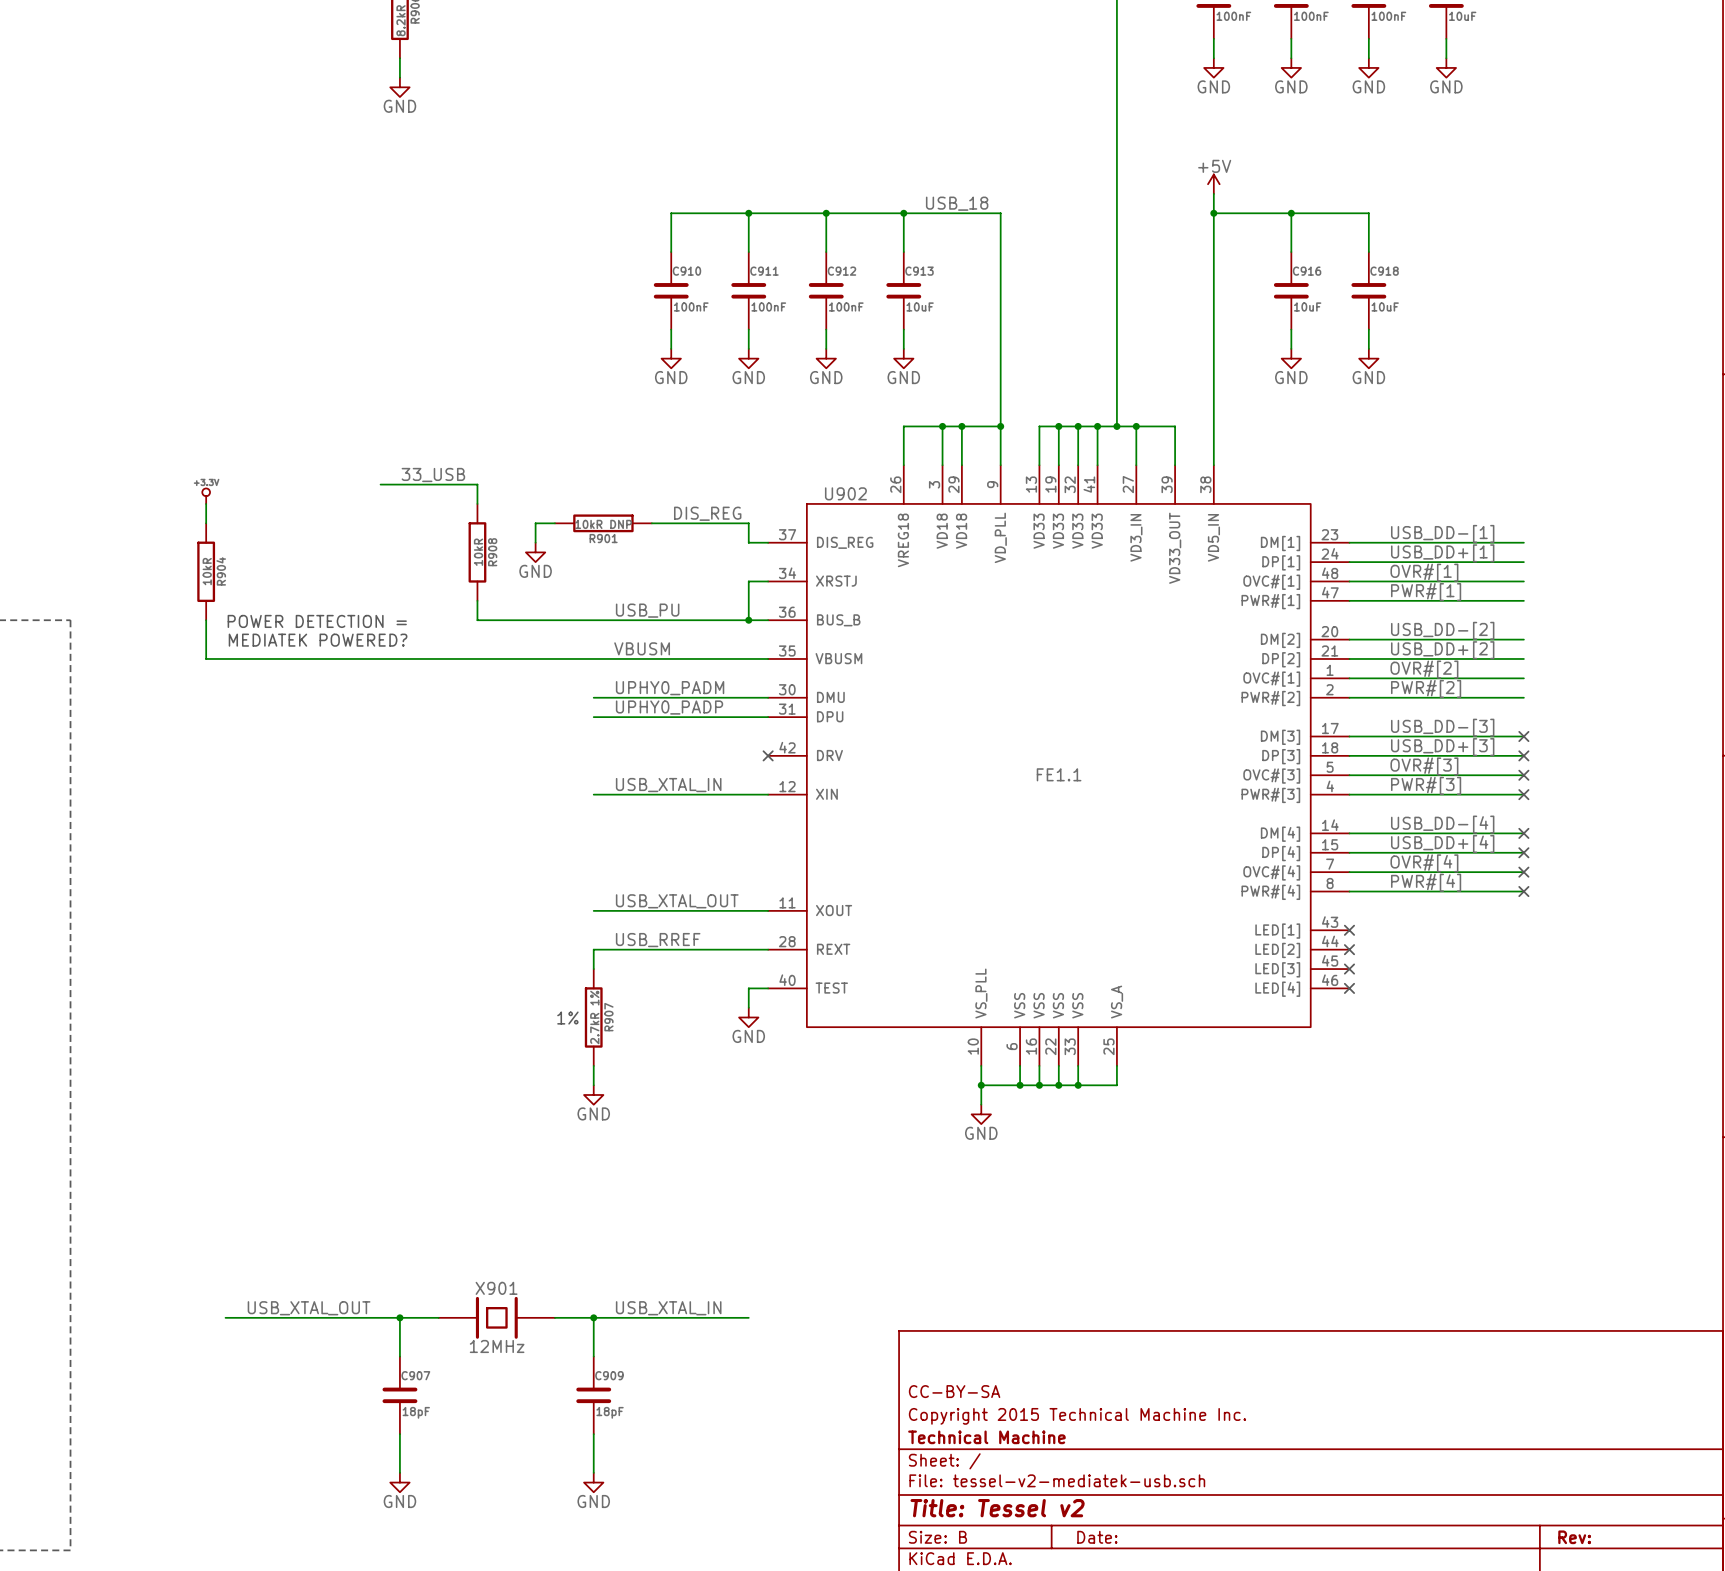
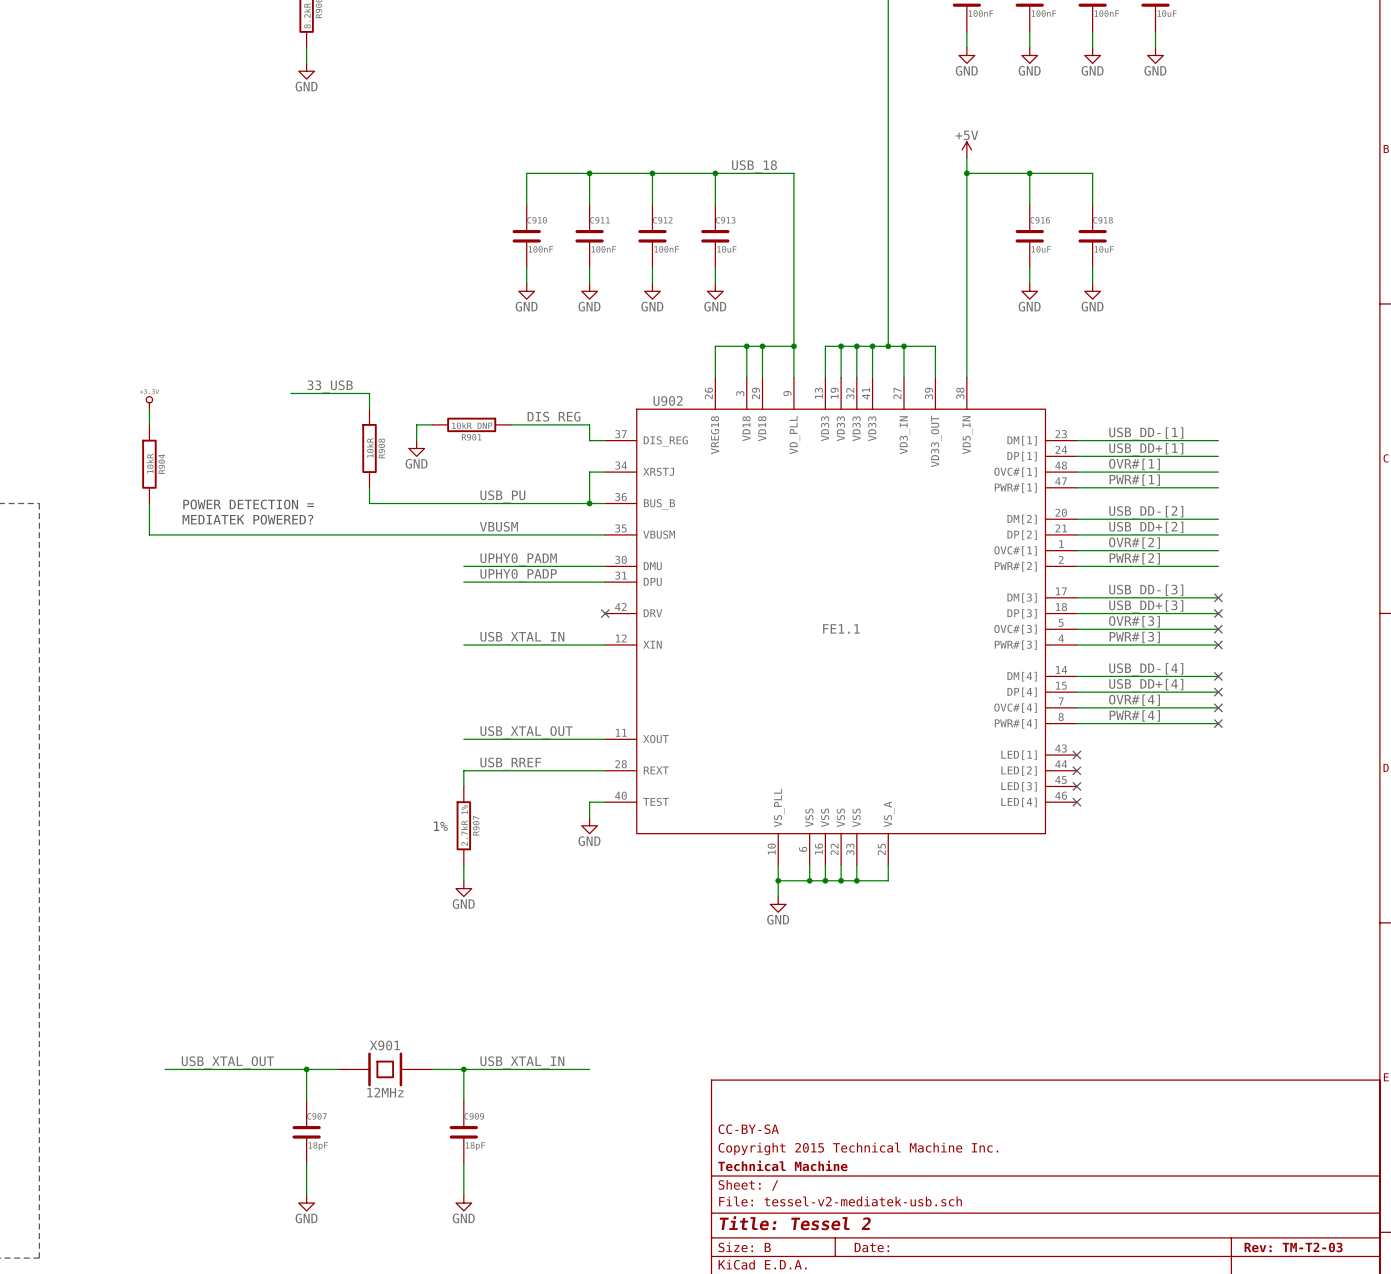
title block: Title: Tessel v2 (997, 1508) -> Title: Tessel 2 (795, 1223)
title block: Rev: (1574, 1537) -> Rev: TM-T2-03 (1293, 1247)

